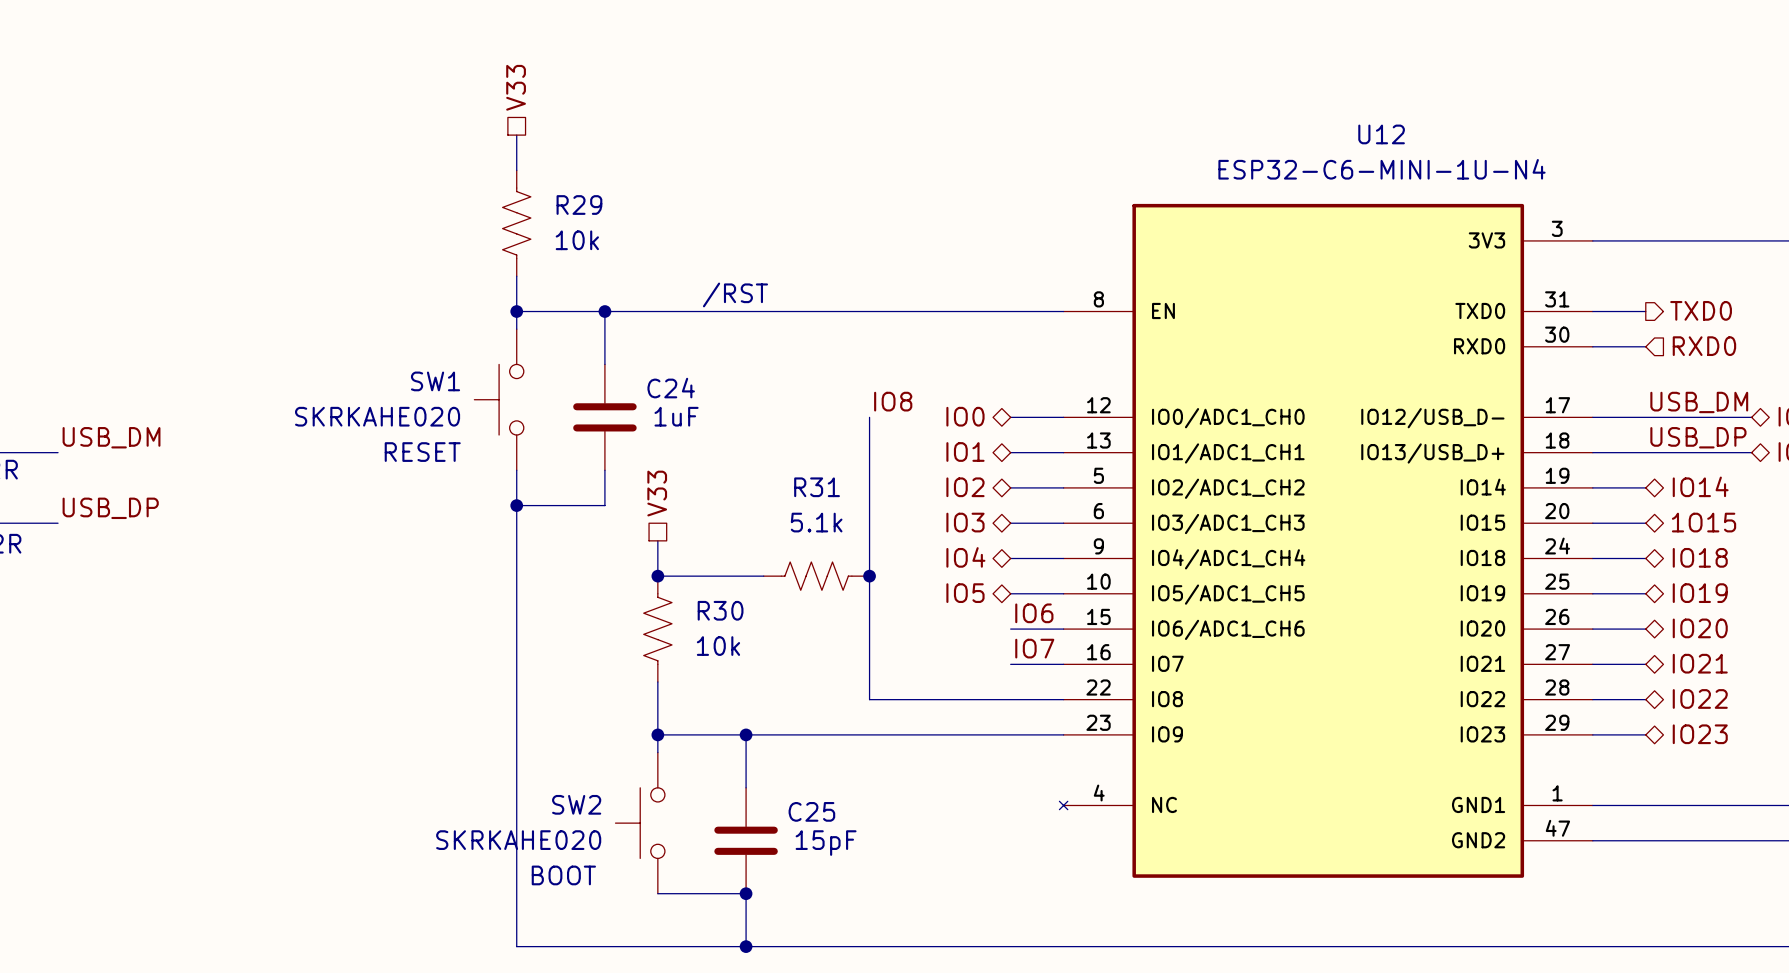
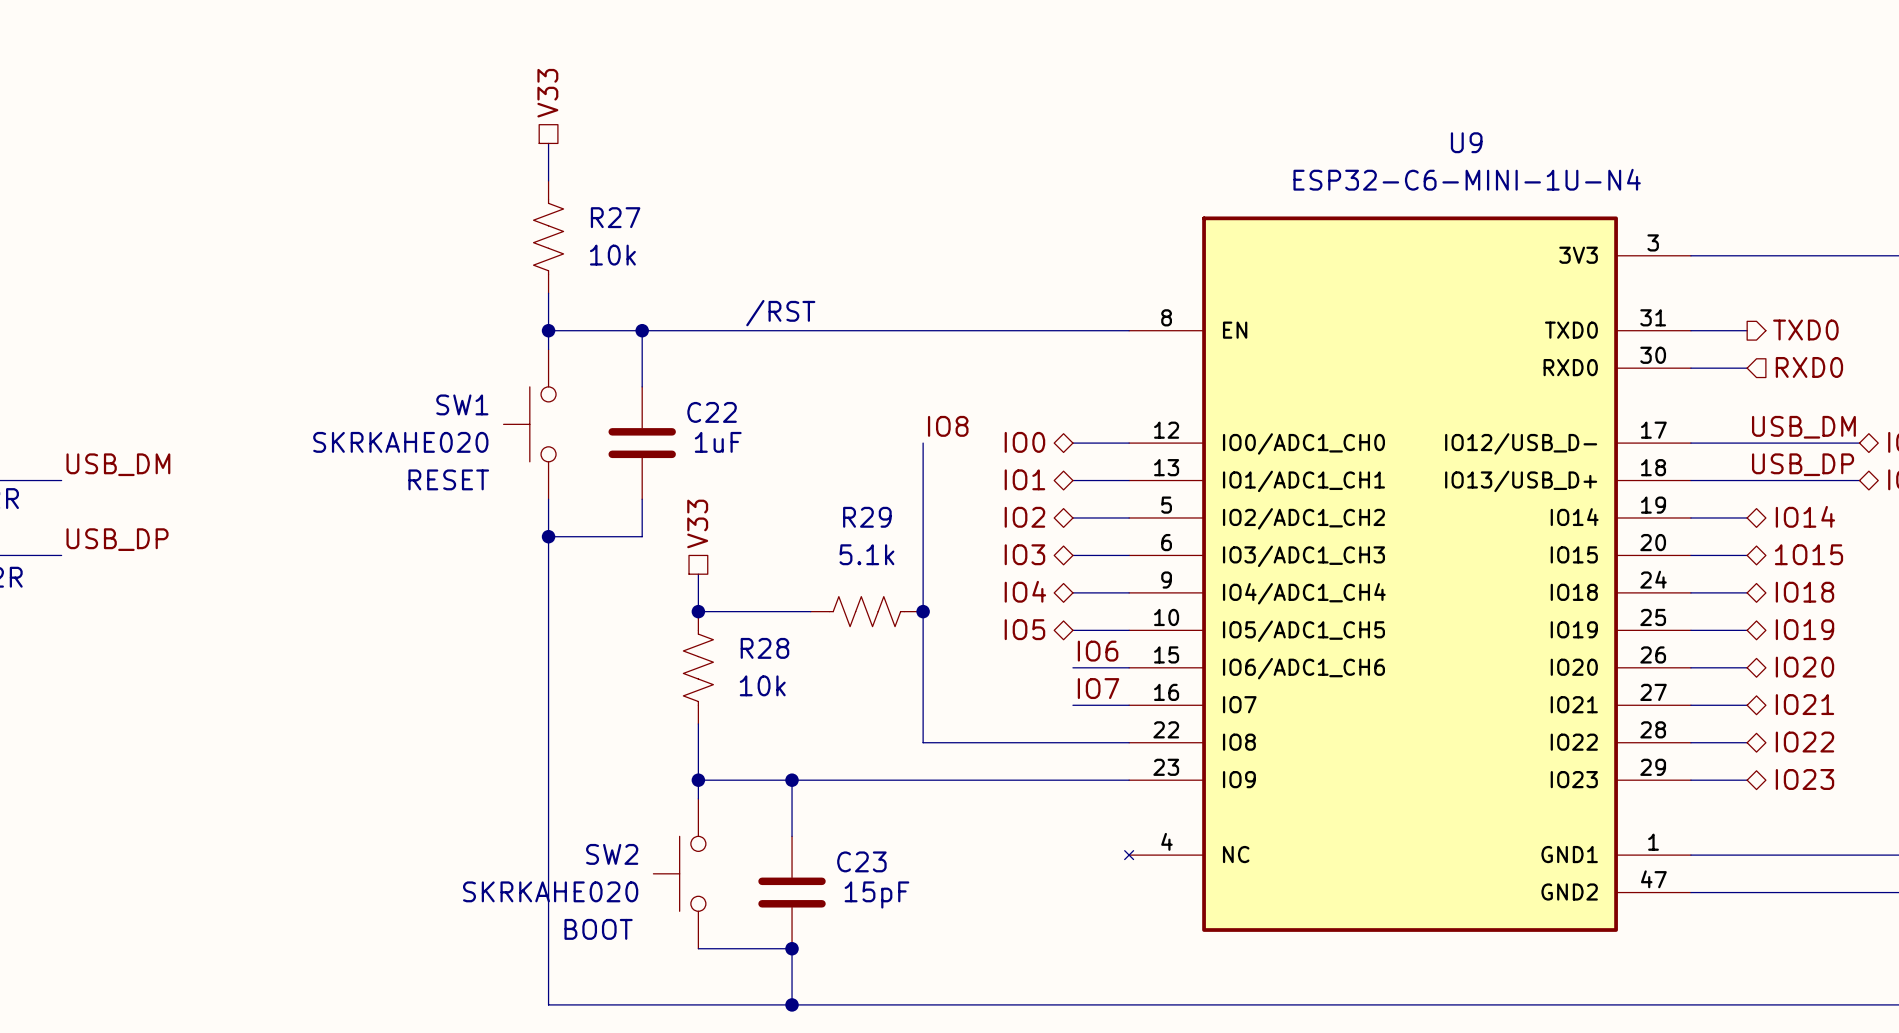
U12 name: U12 (1381, 134) -> U9 (1466, 142)
R29 name: R29 (579, 205) -> R27 (615, 217)
C24 name: C24 (671, 388) -> C22 (712, 412)
R31 name: R31 (817, 487) -> R29 (867, 517)
R30 name: R30 (720, 610) -> R28 (764, 648)
C25 name: C25 (811, 811) -> C23 (861, 861)

